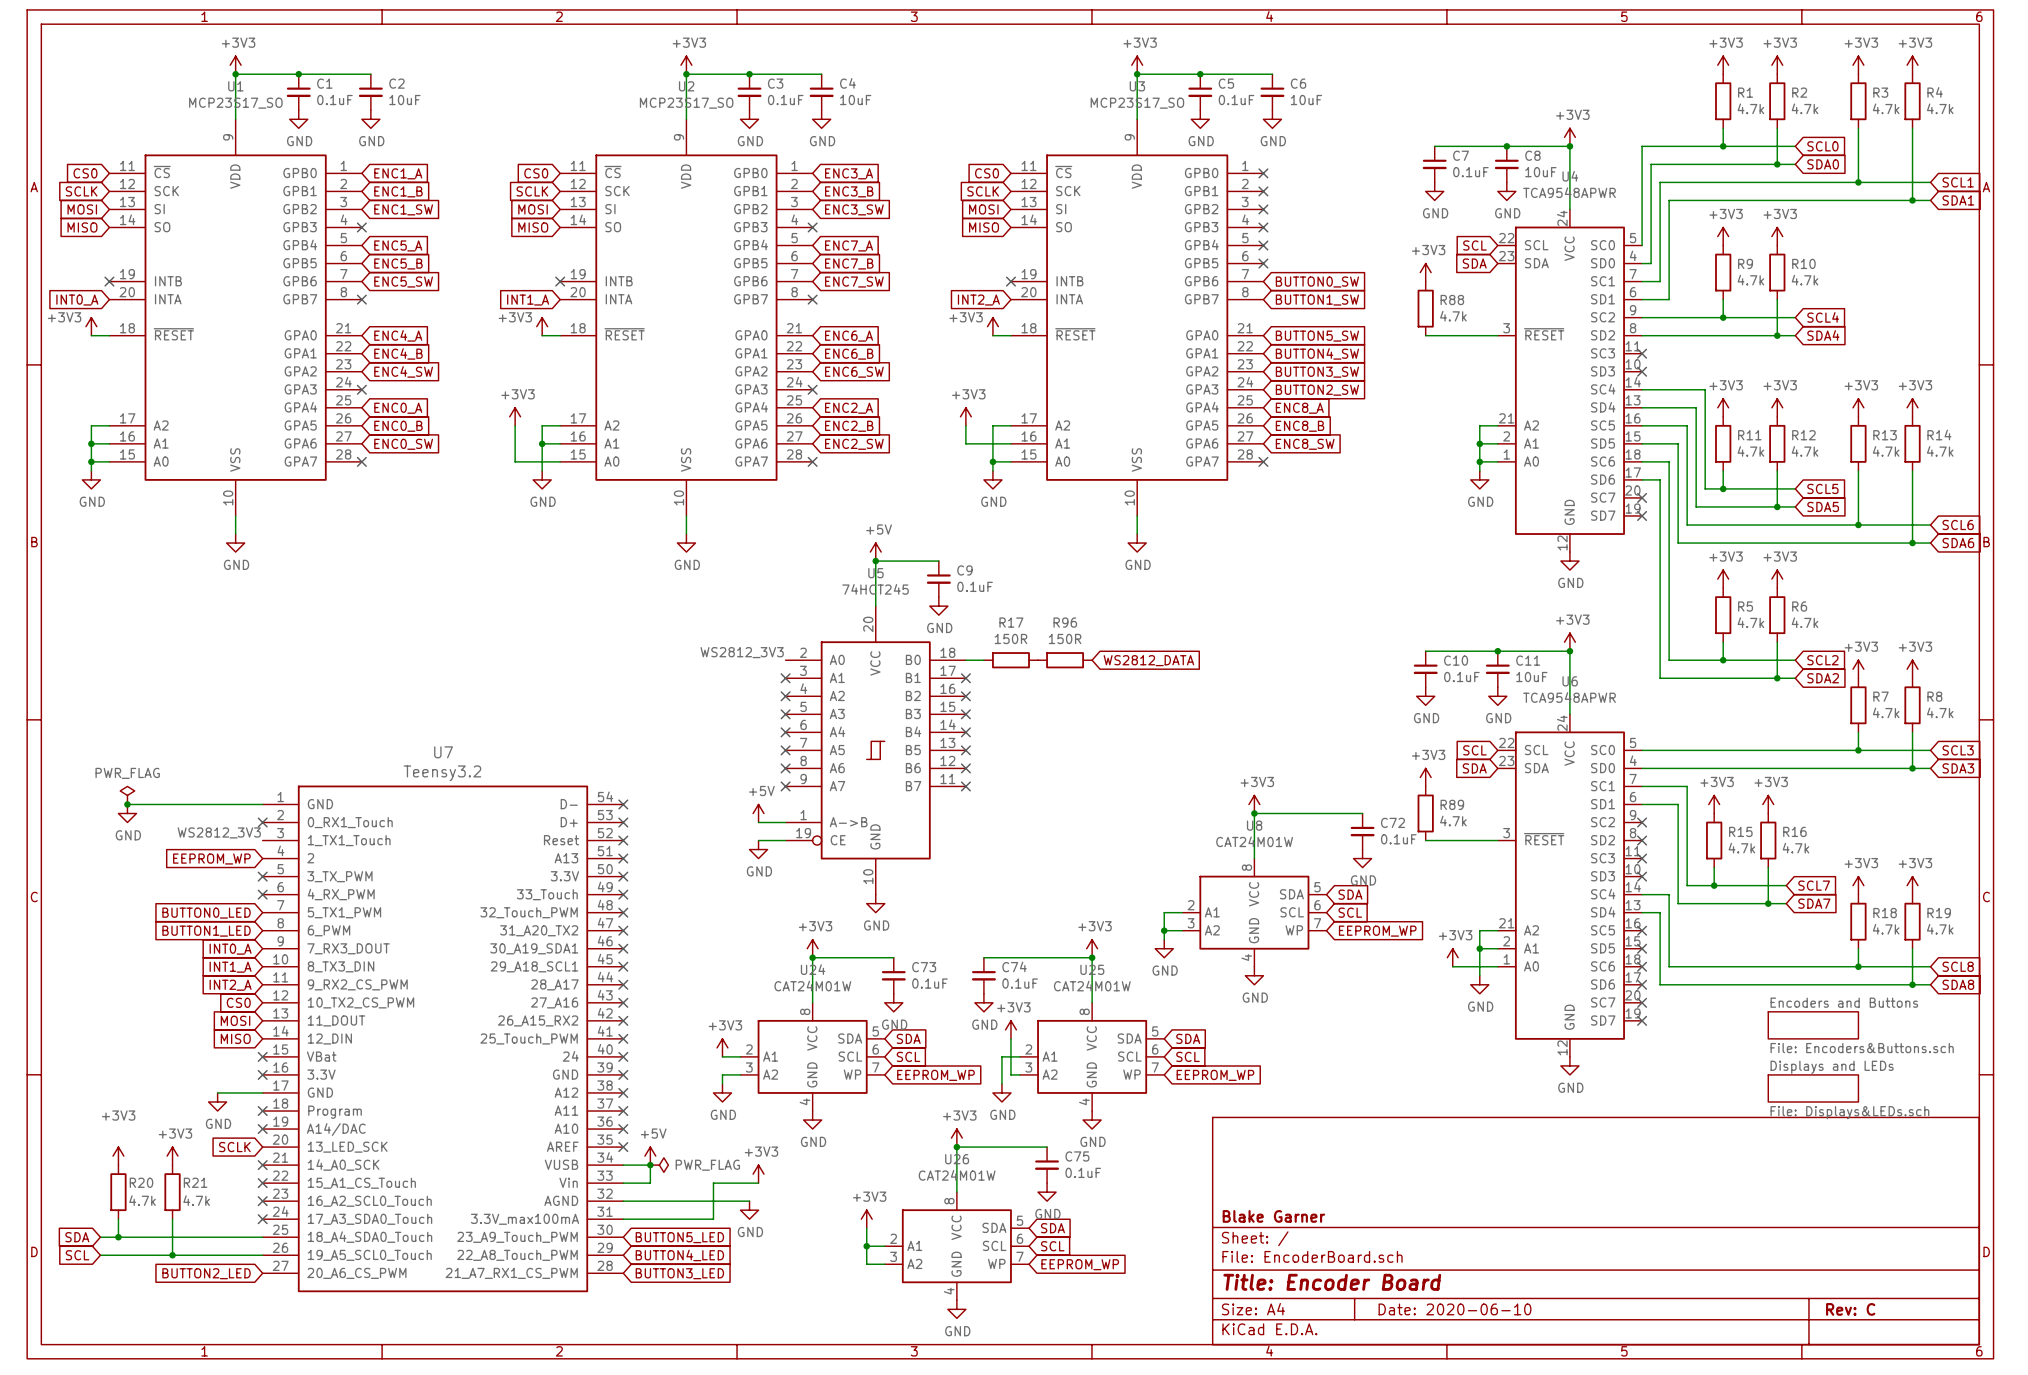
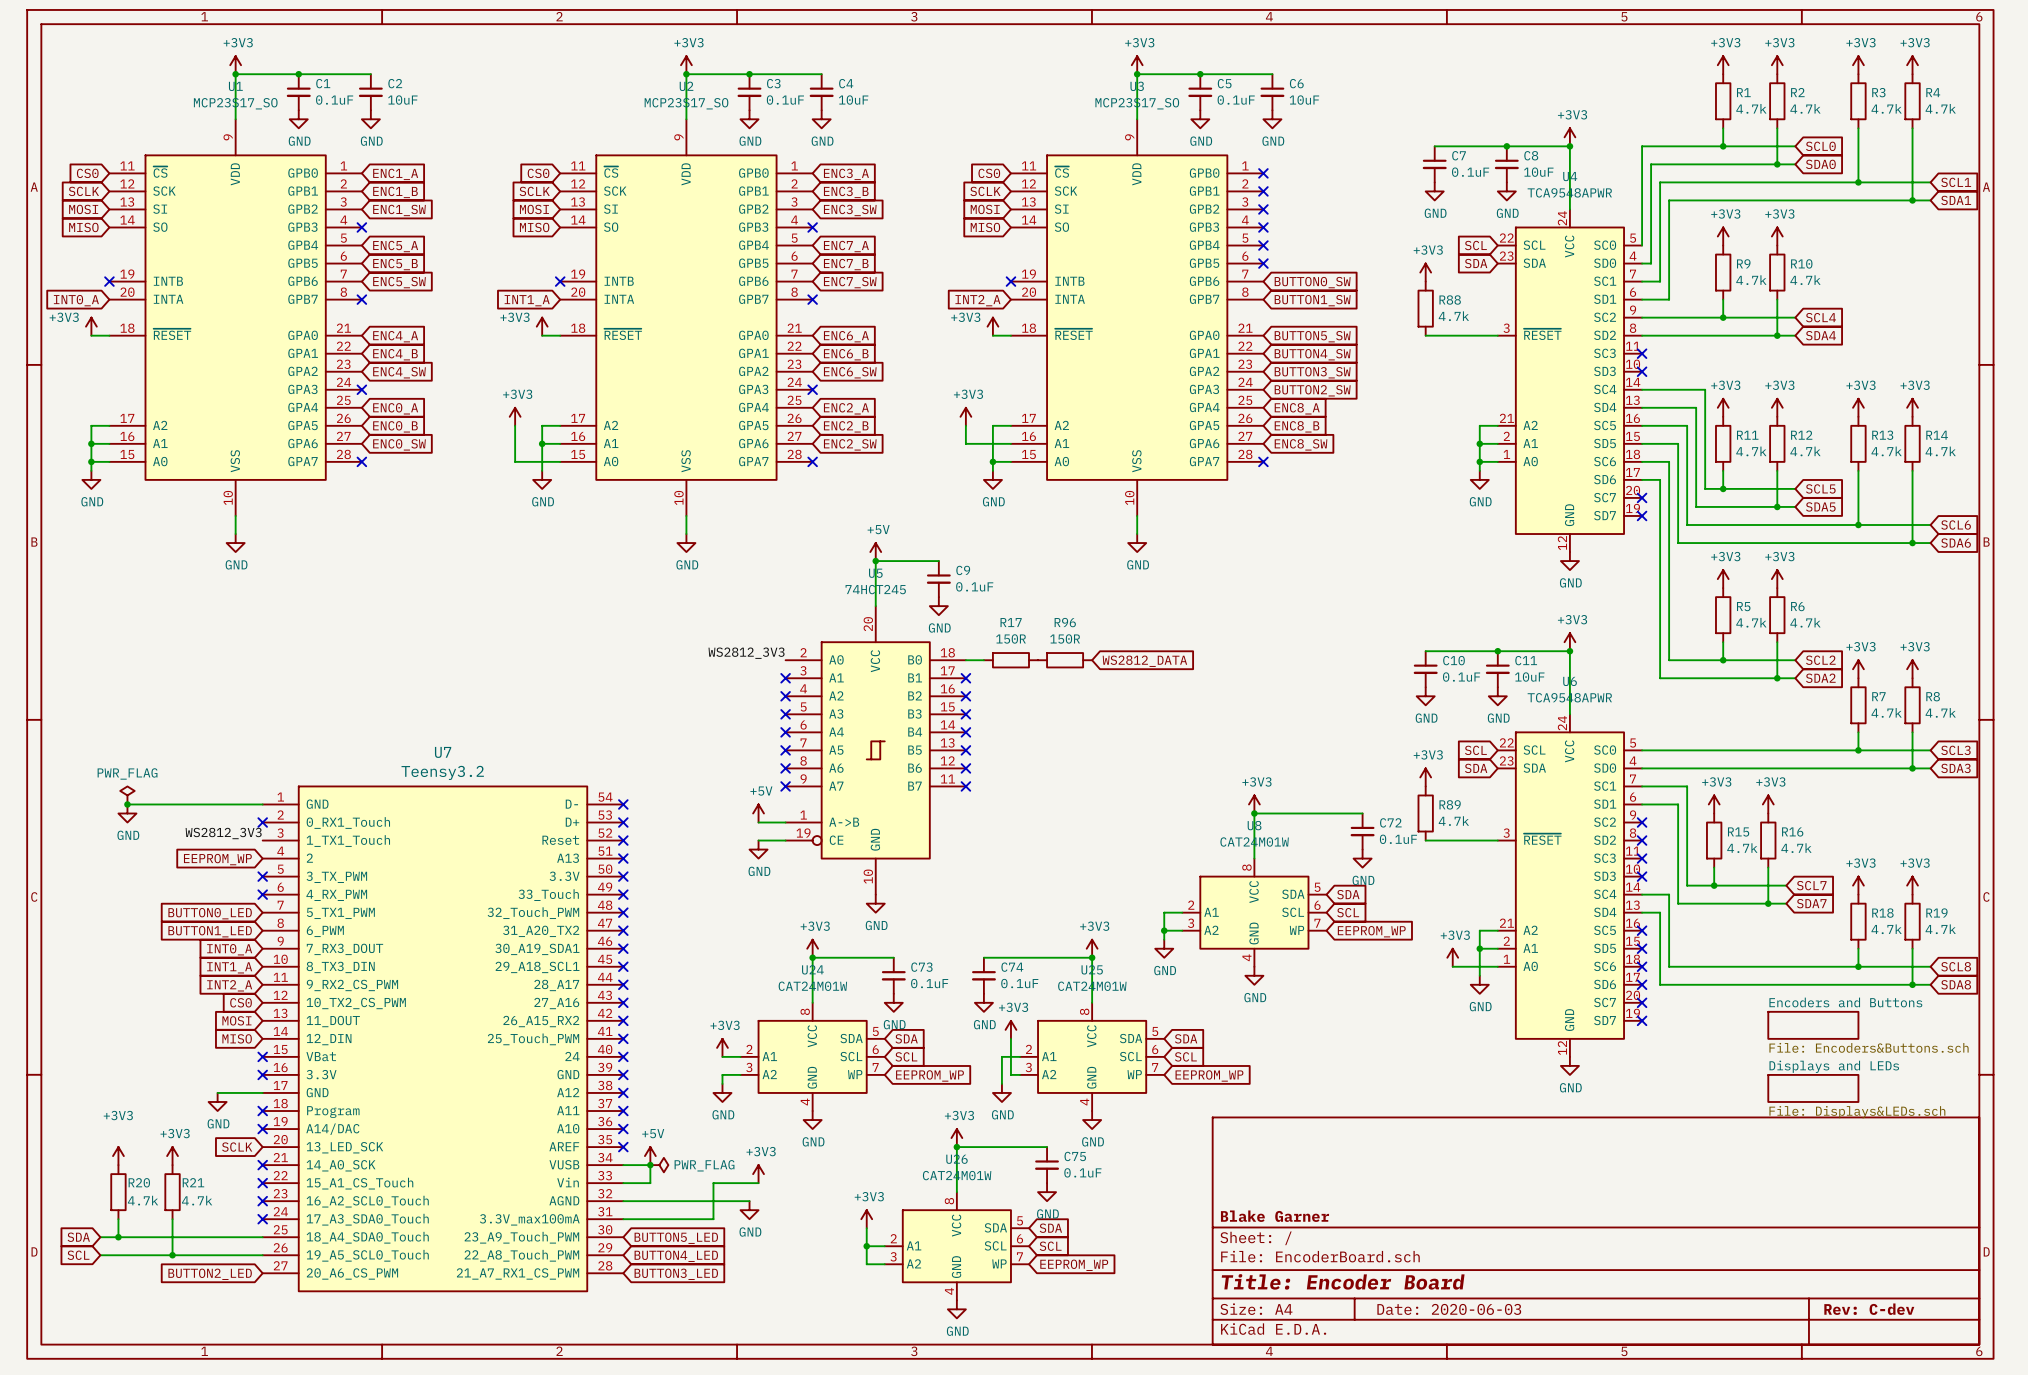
title block: Date: 2020-06-10 (1454, 1309) -> Date: 2020-06-03 (1449, 1309)
title block: Rev: C (1850, 1309) -> Rev: C-dev (1869, 1309)

